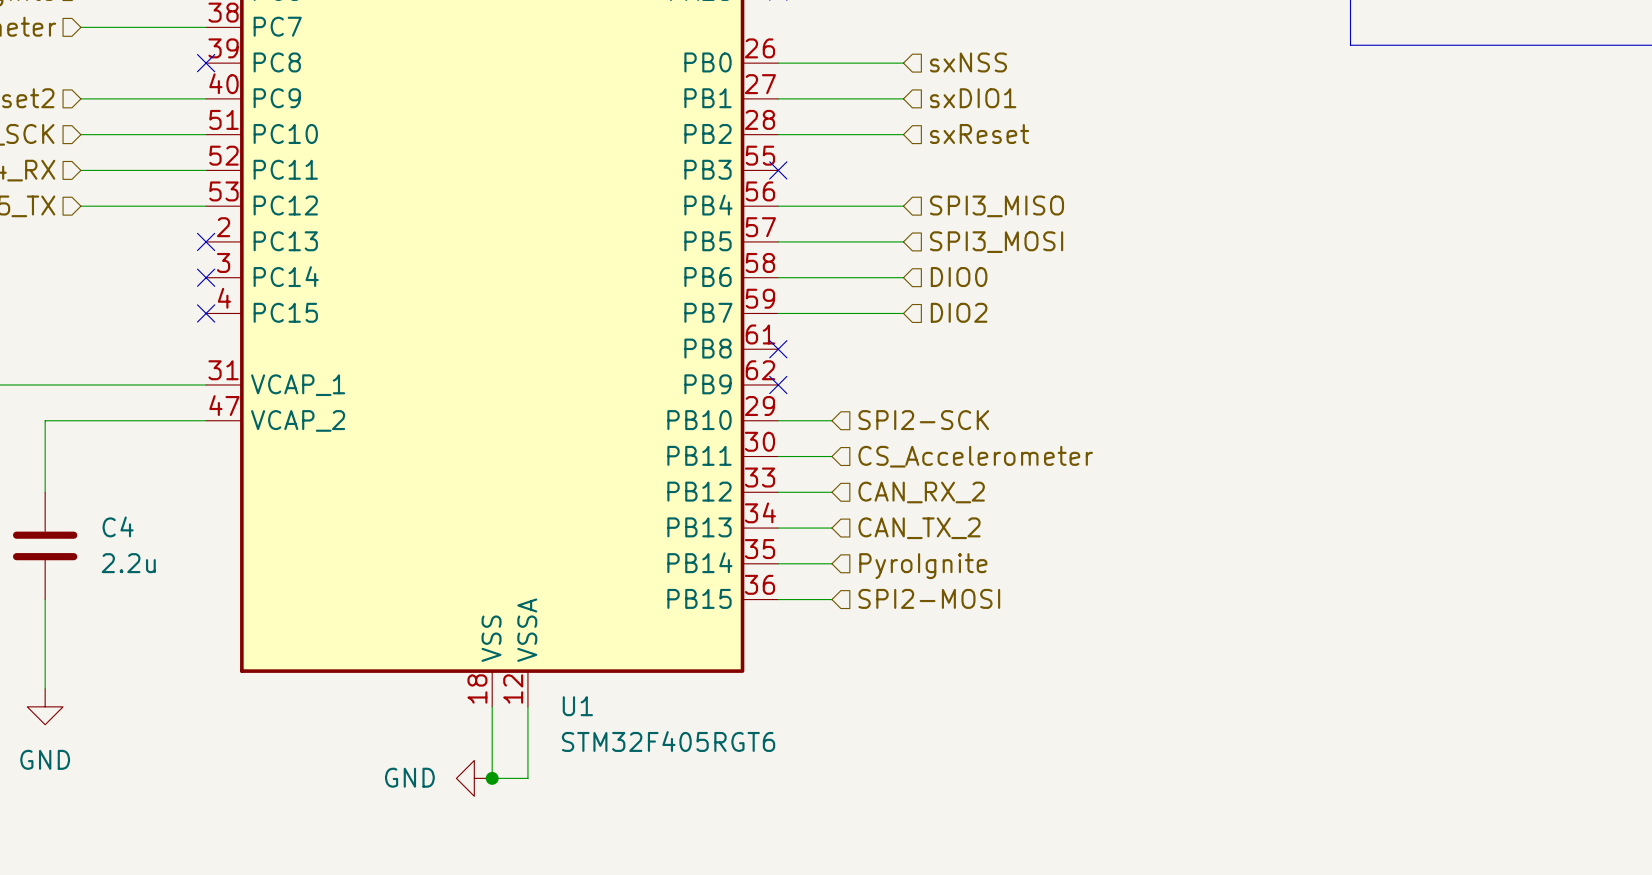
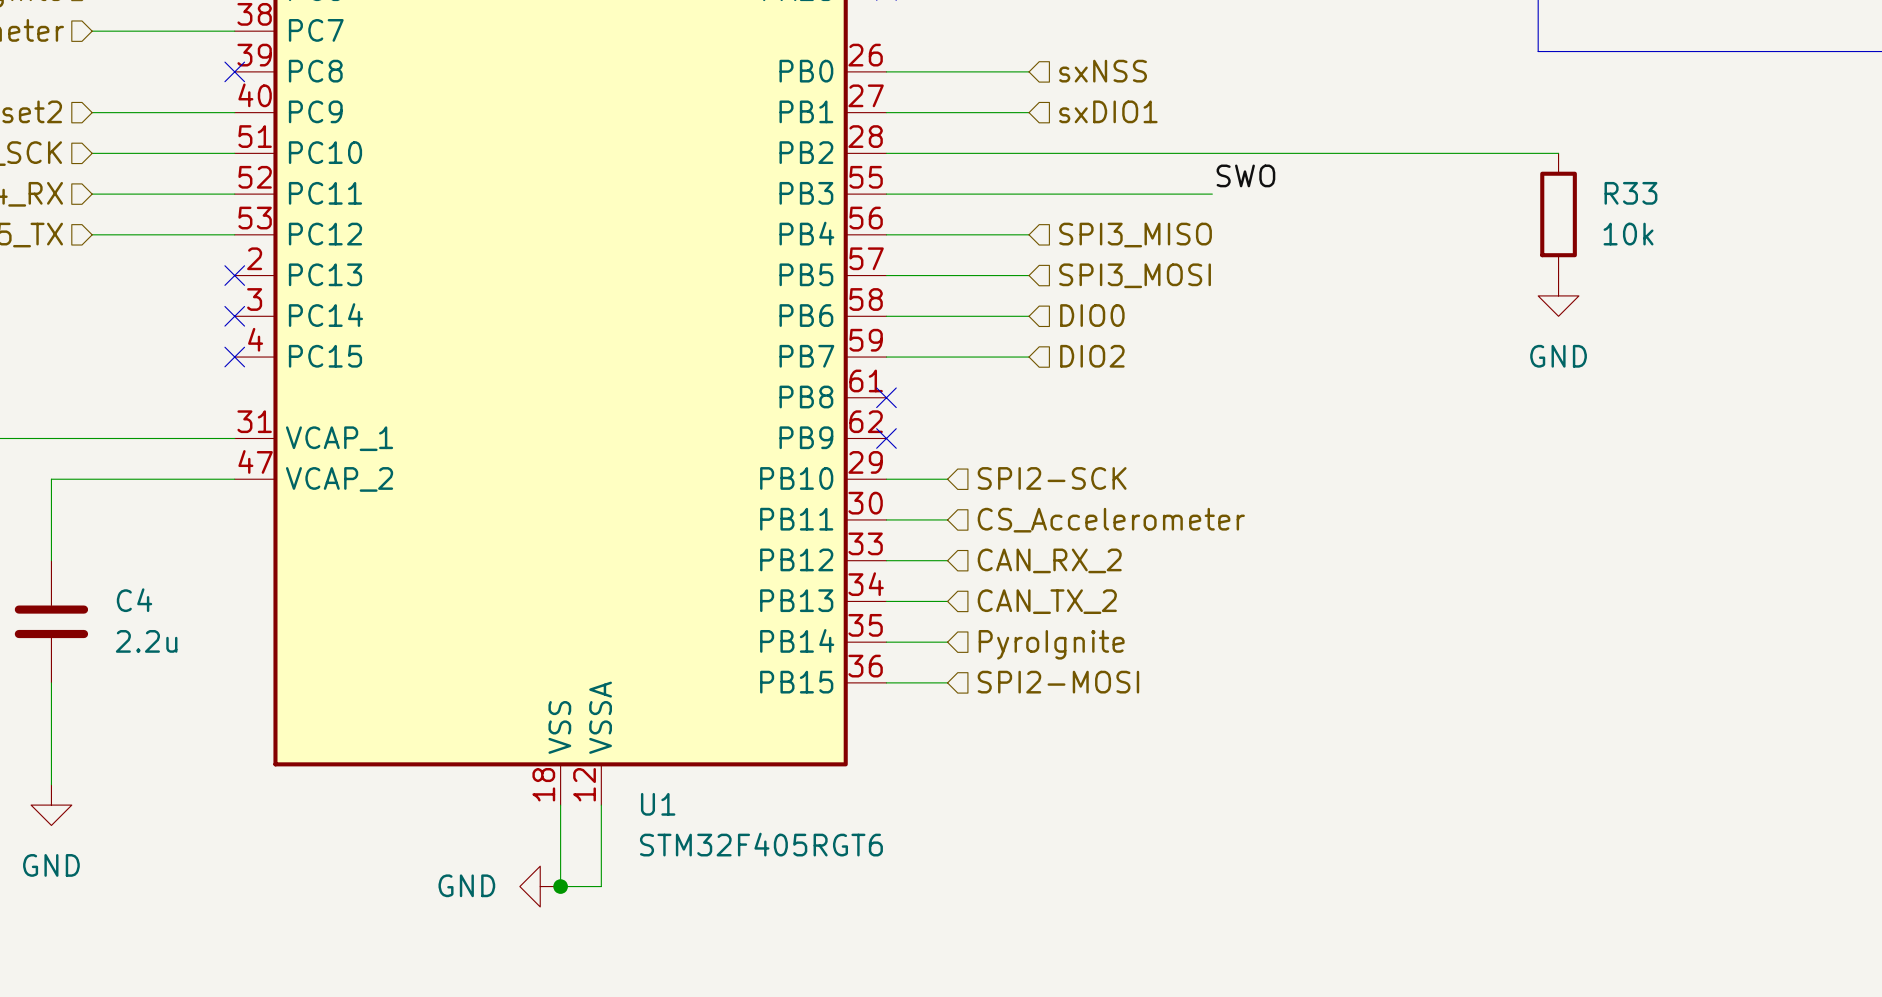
hierarchical label: sxReset (979, 133) -> none
wire: none -> (1029, 153) (1558, 153)
label: none -> SWO (1245, 175)
wire: none -> (886, 194) (1212, 194)
no-connect mark: (778, 170) -> none
R33: none -> 10k (1558, 214)
power symbol: none -> GND (1558, 295)

